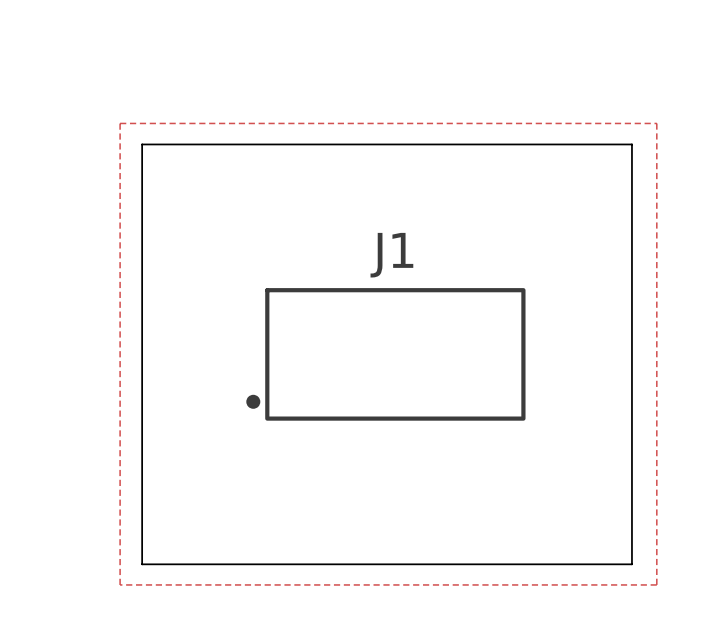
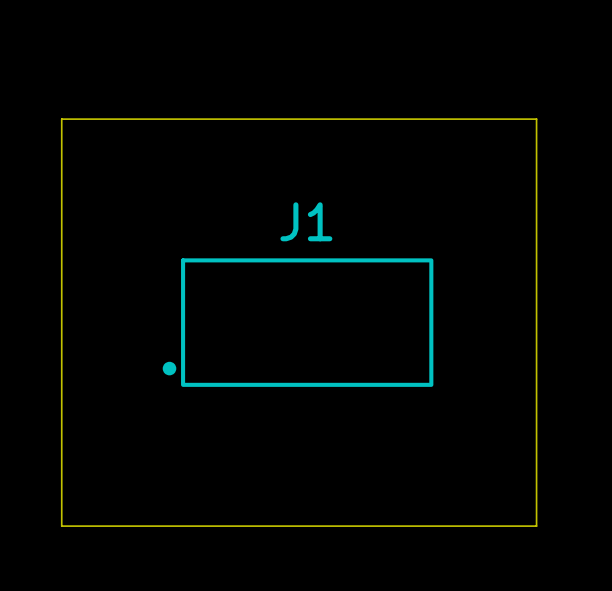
zone outline: (120, 123) (656, 123) (656, 584) (120, 584) (120, 123) -> none

